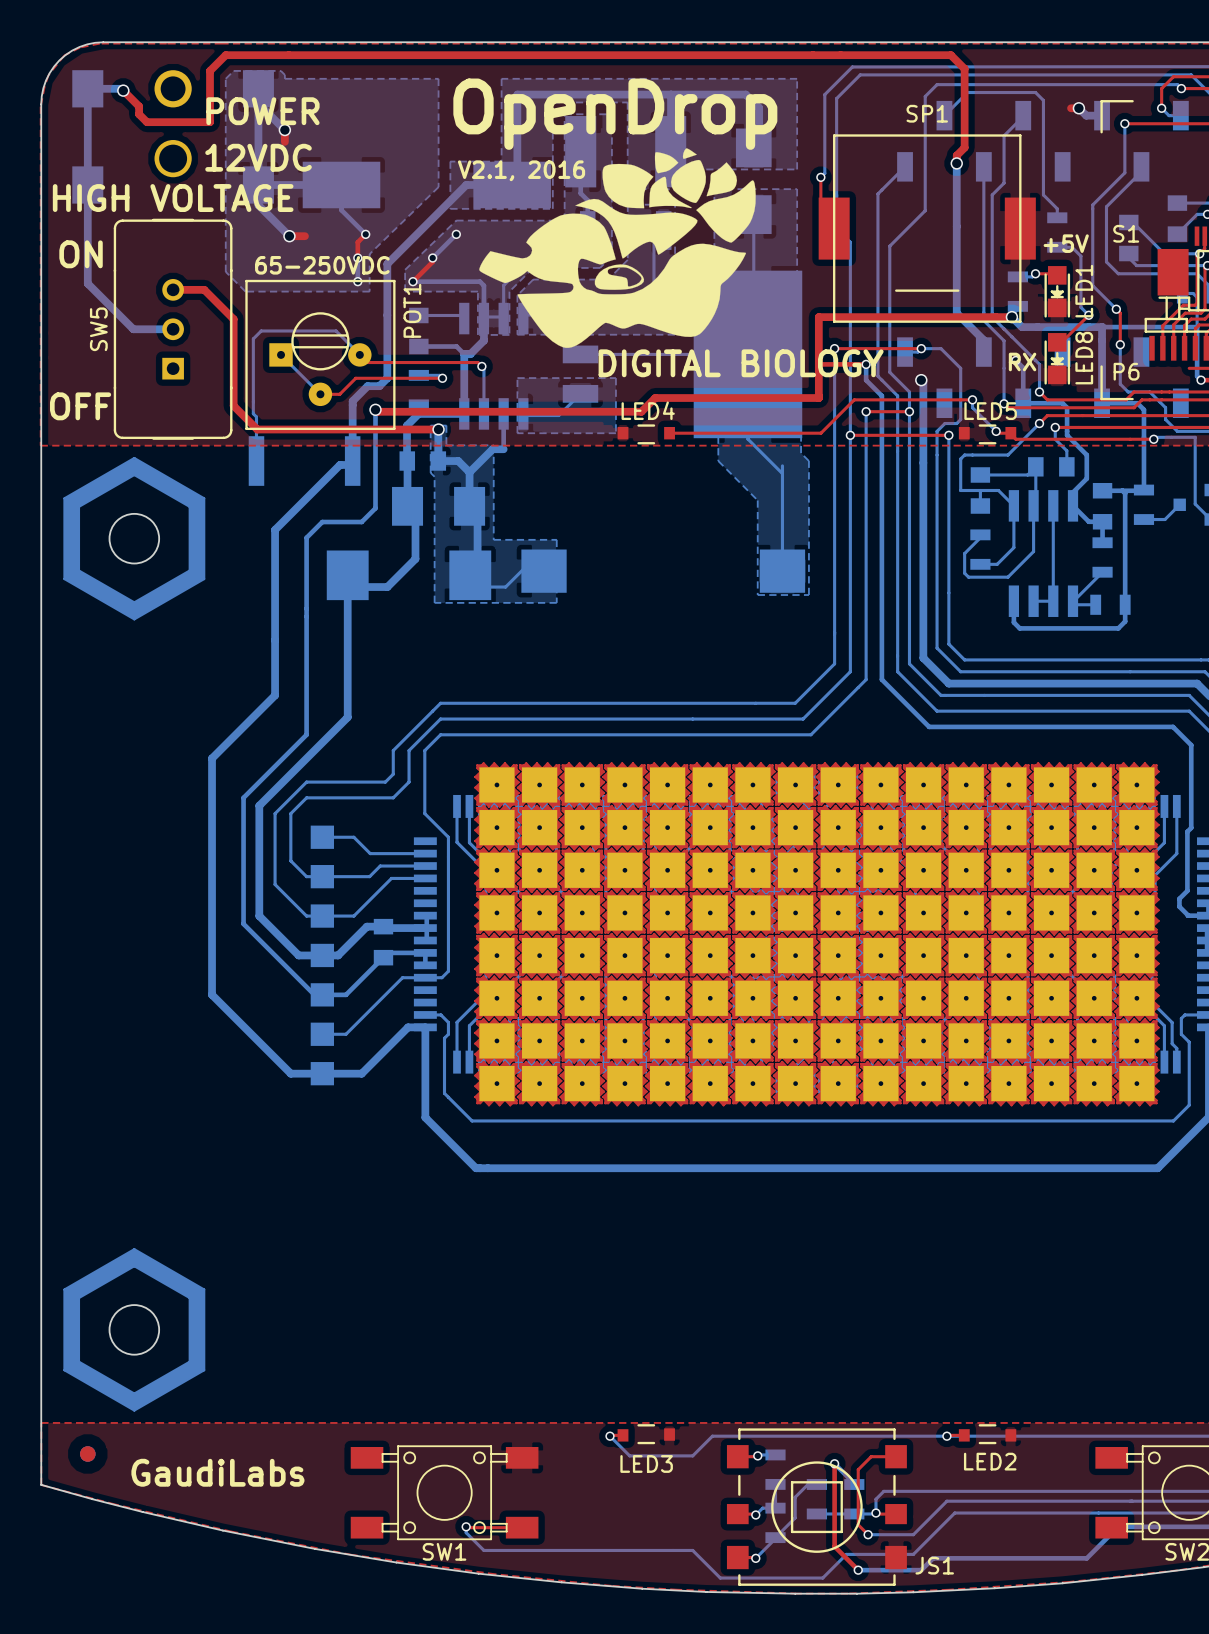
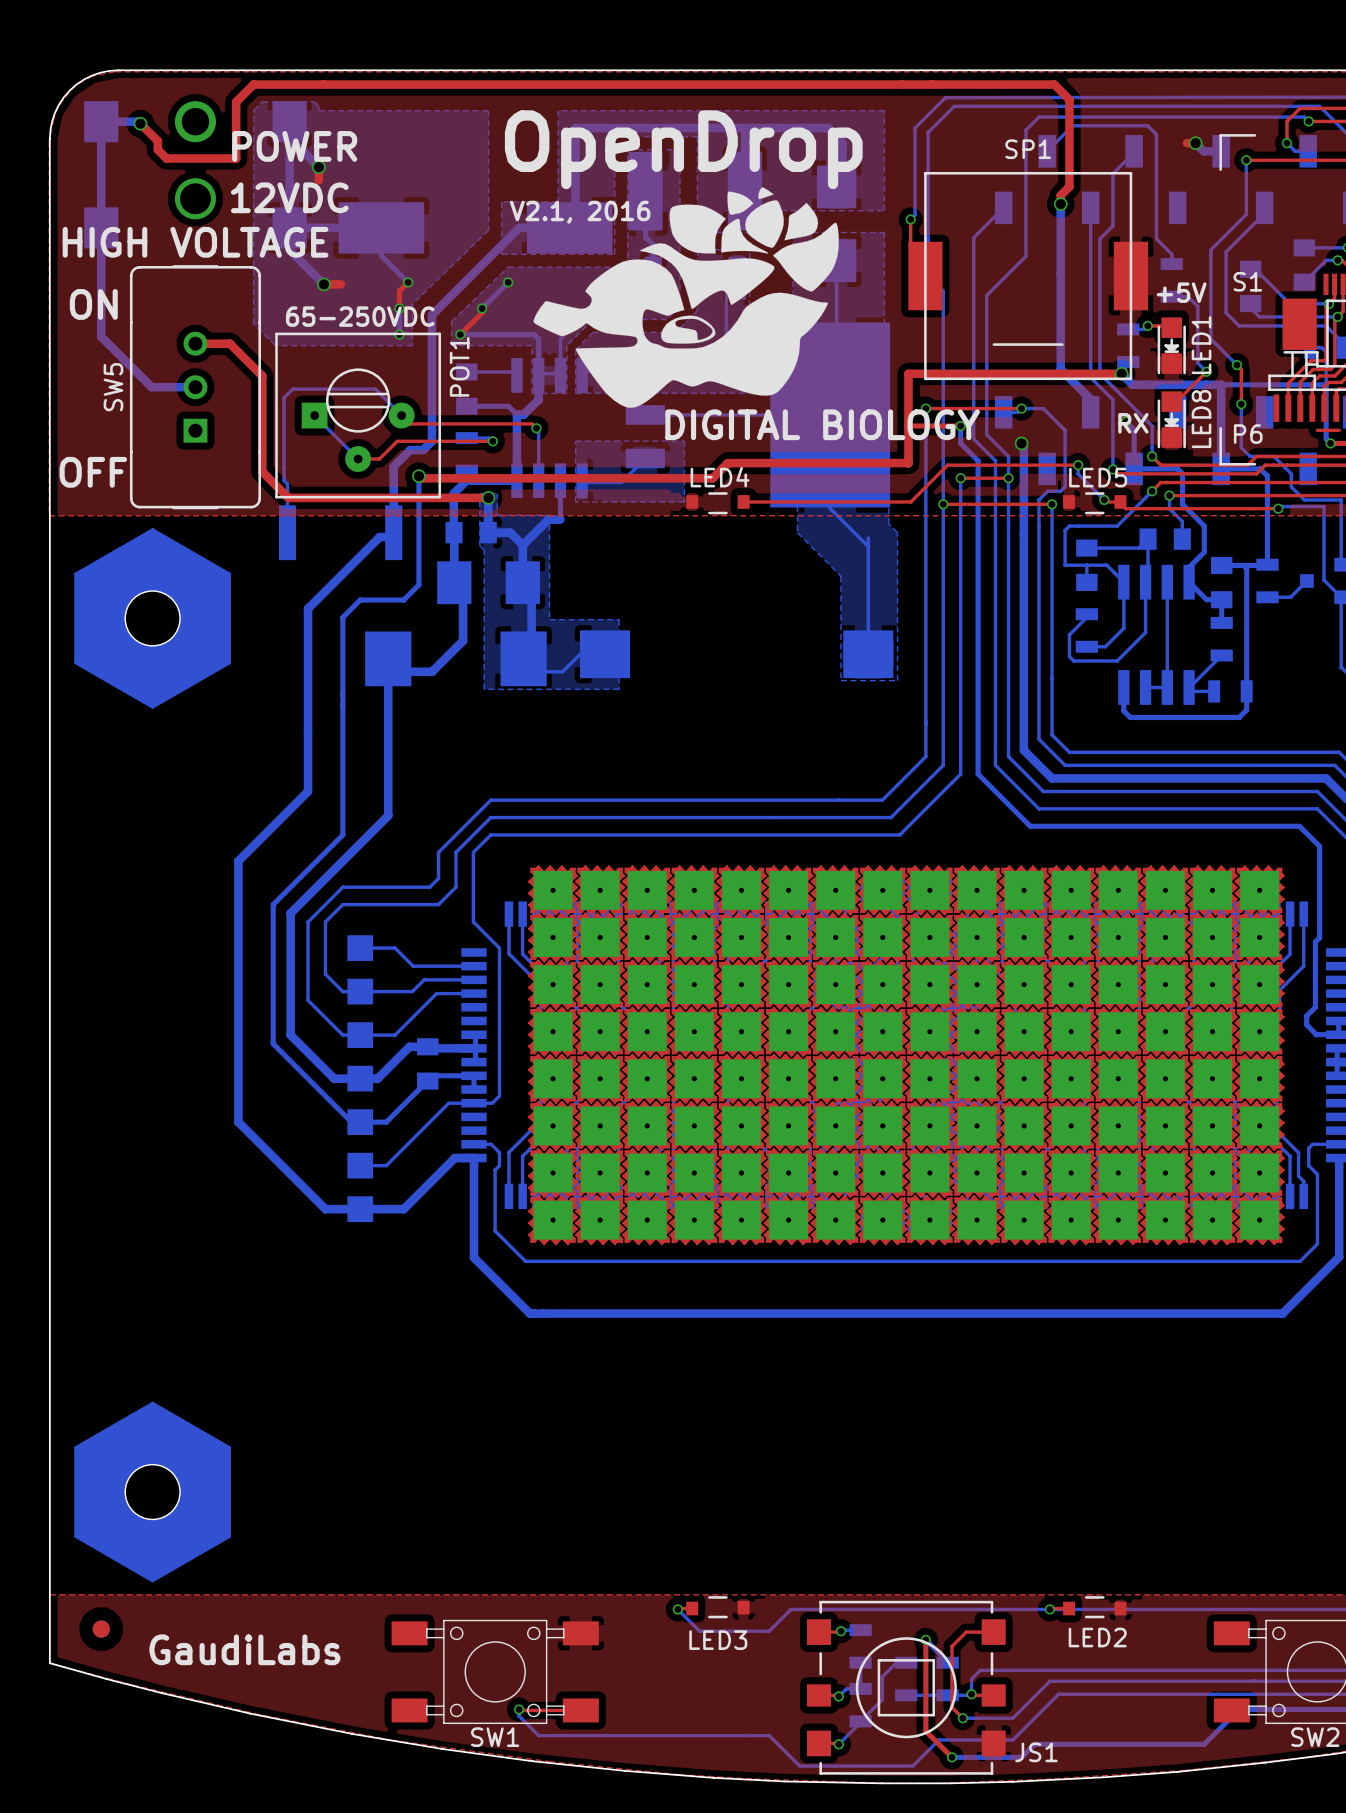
part footprint: [63, 456, 206, 621] -> [74, 528, 232, 709]
part footprint: [63, 1248, 206, 1412] -> [74, 1401, 232, 1583]

